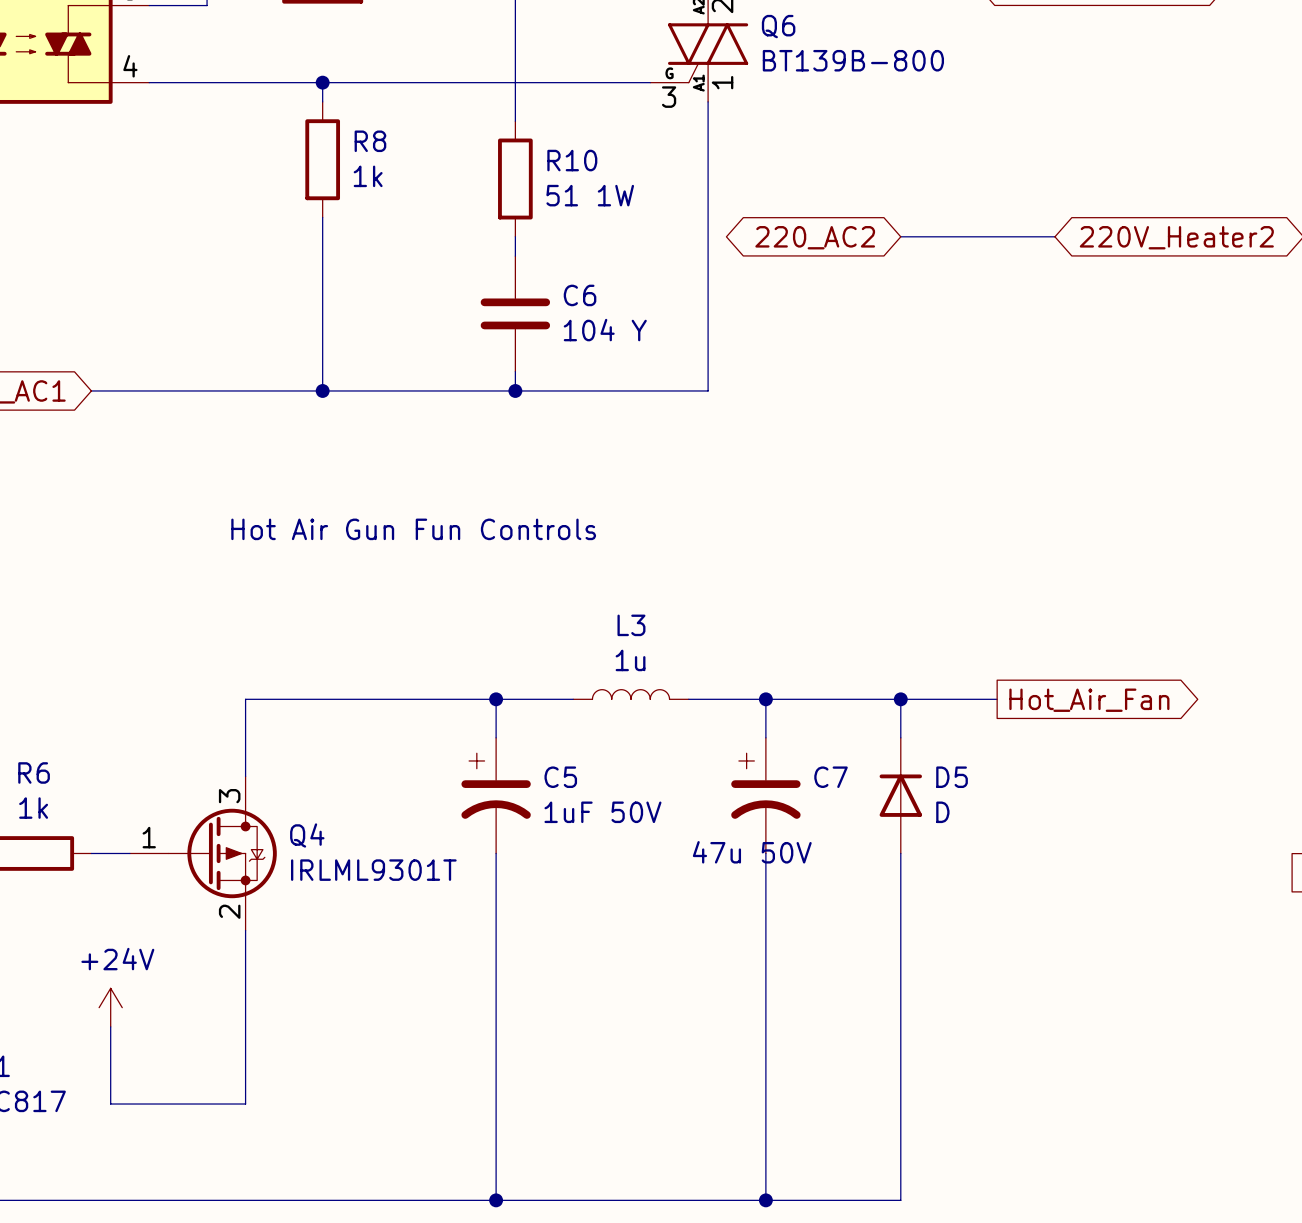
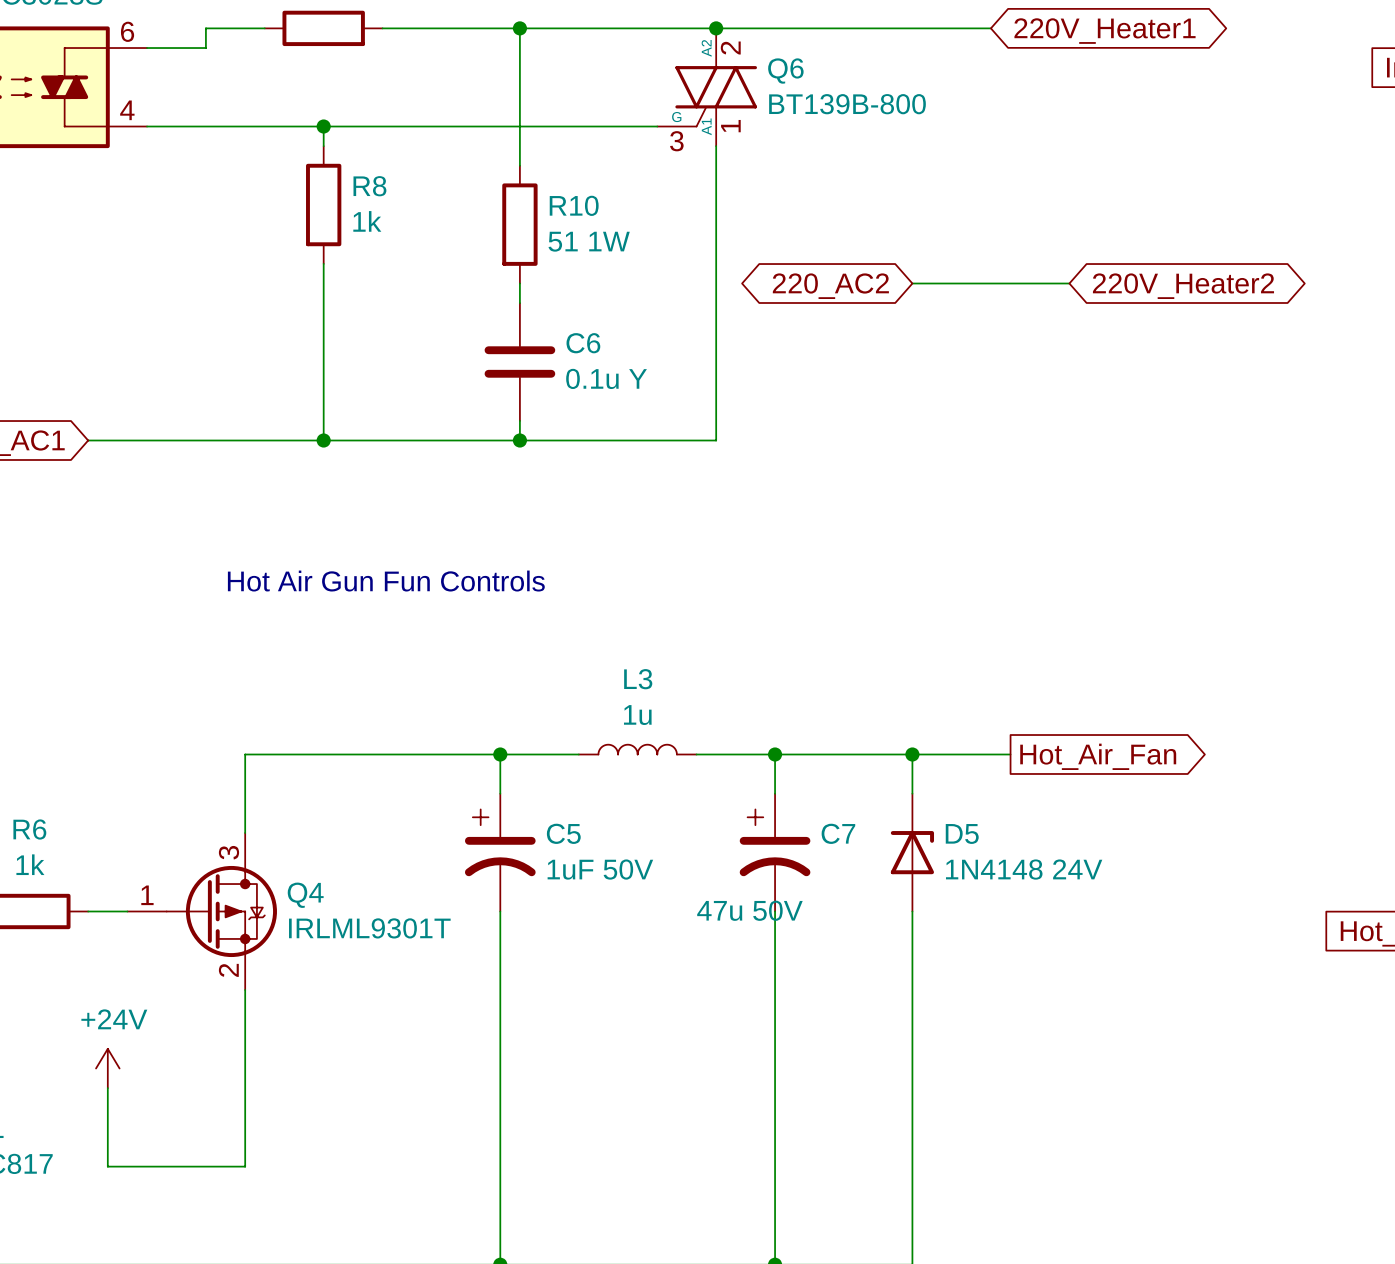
C6 value: 104 Y (605, 330) -> 0.1u Y (606, 378)
D5 symbol: [879, 737, 922, 854] -> [890, 793, 935, 912]
D5 value: D (942, 812) -> 1N4148 24V (1024, 869)

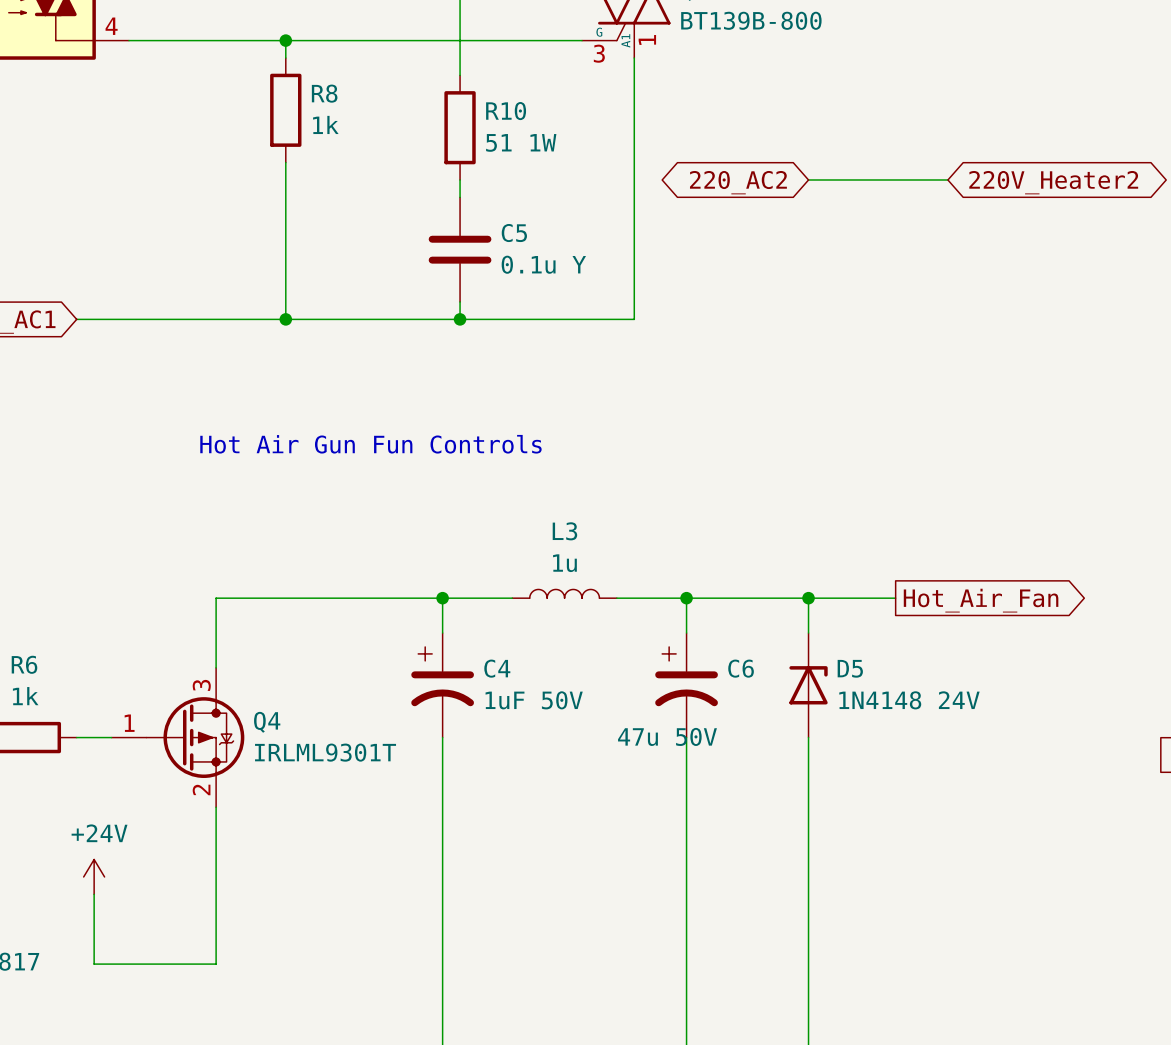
C6 name: C6 (583, 343) -> C5 (514, 233)
C5 name: C5 (563, 833) -> C4 (497, 668)
C7 name: C7 (838, 833) -> C6 (741, 668)

